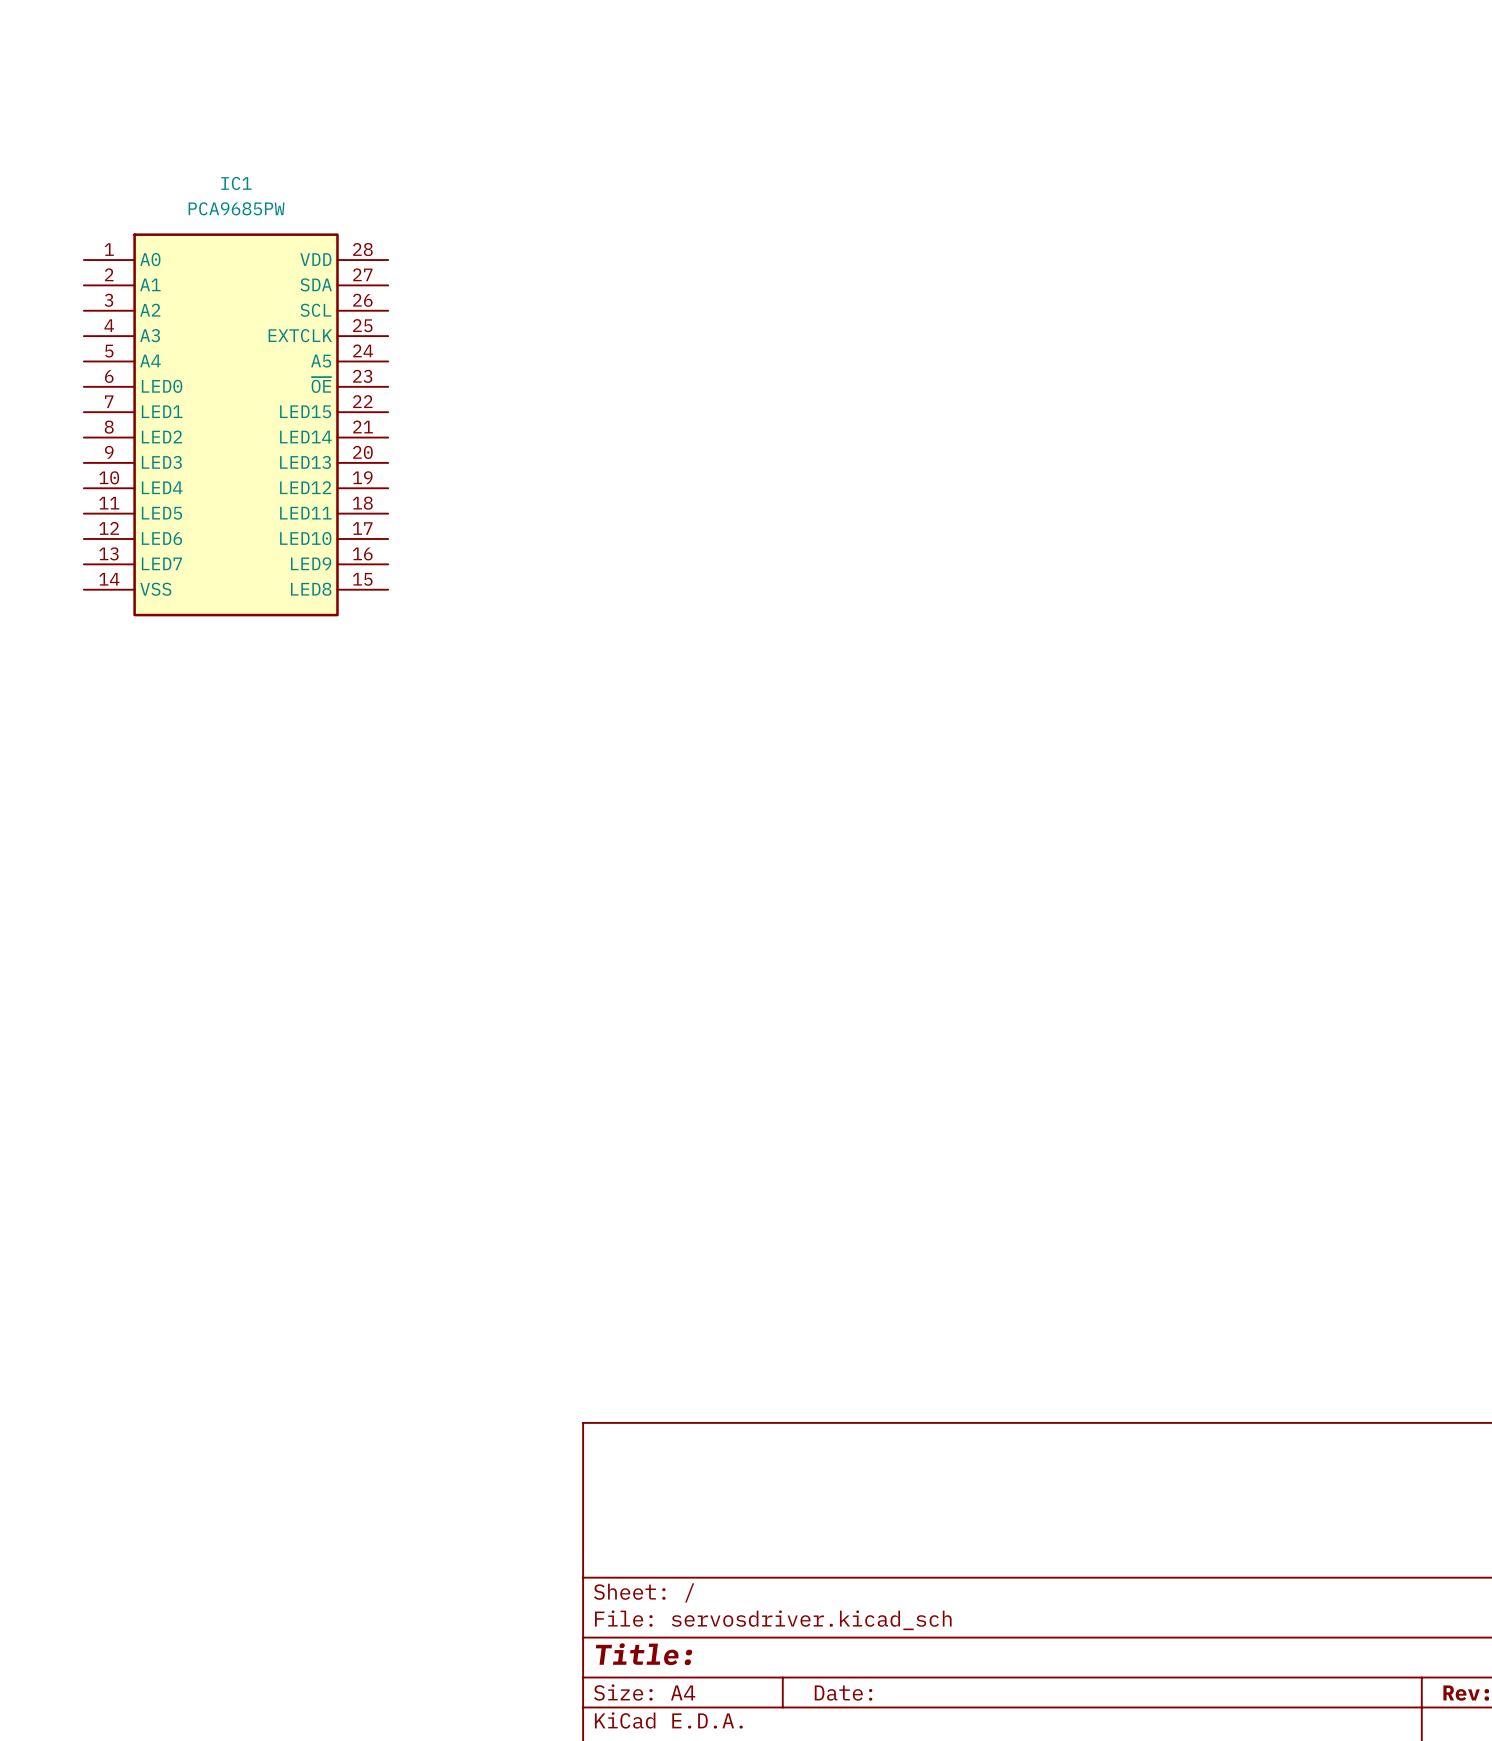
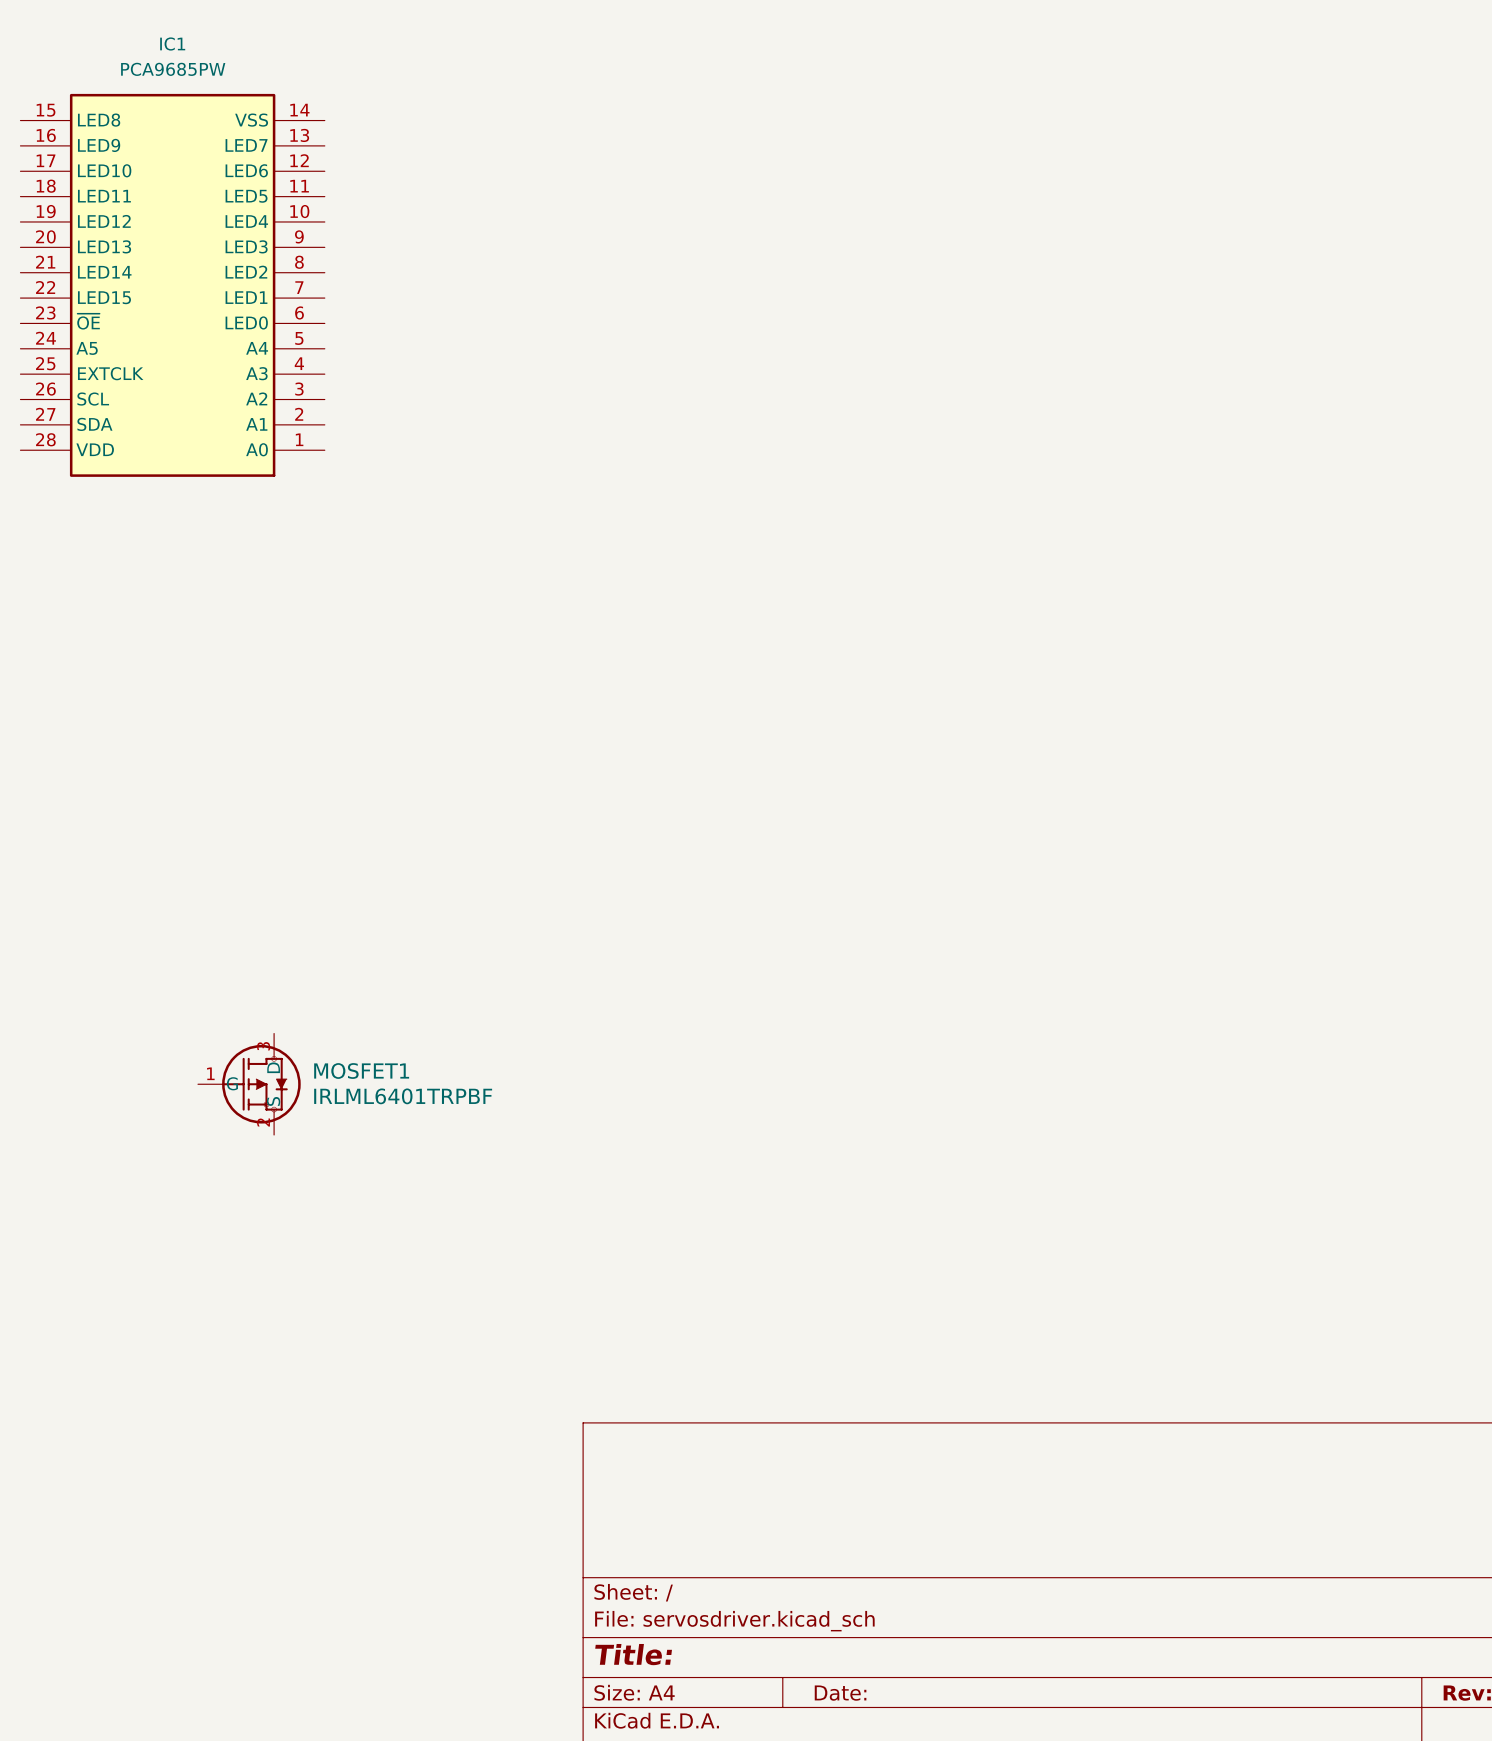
IC1 rotation: 0° (236, 424) -> 180° (172, 285)
MOSFET1: none -> IRLML6401TRPBF (249, 1084)

